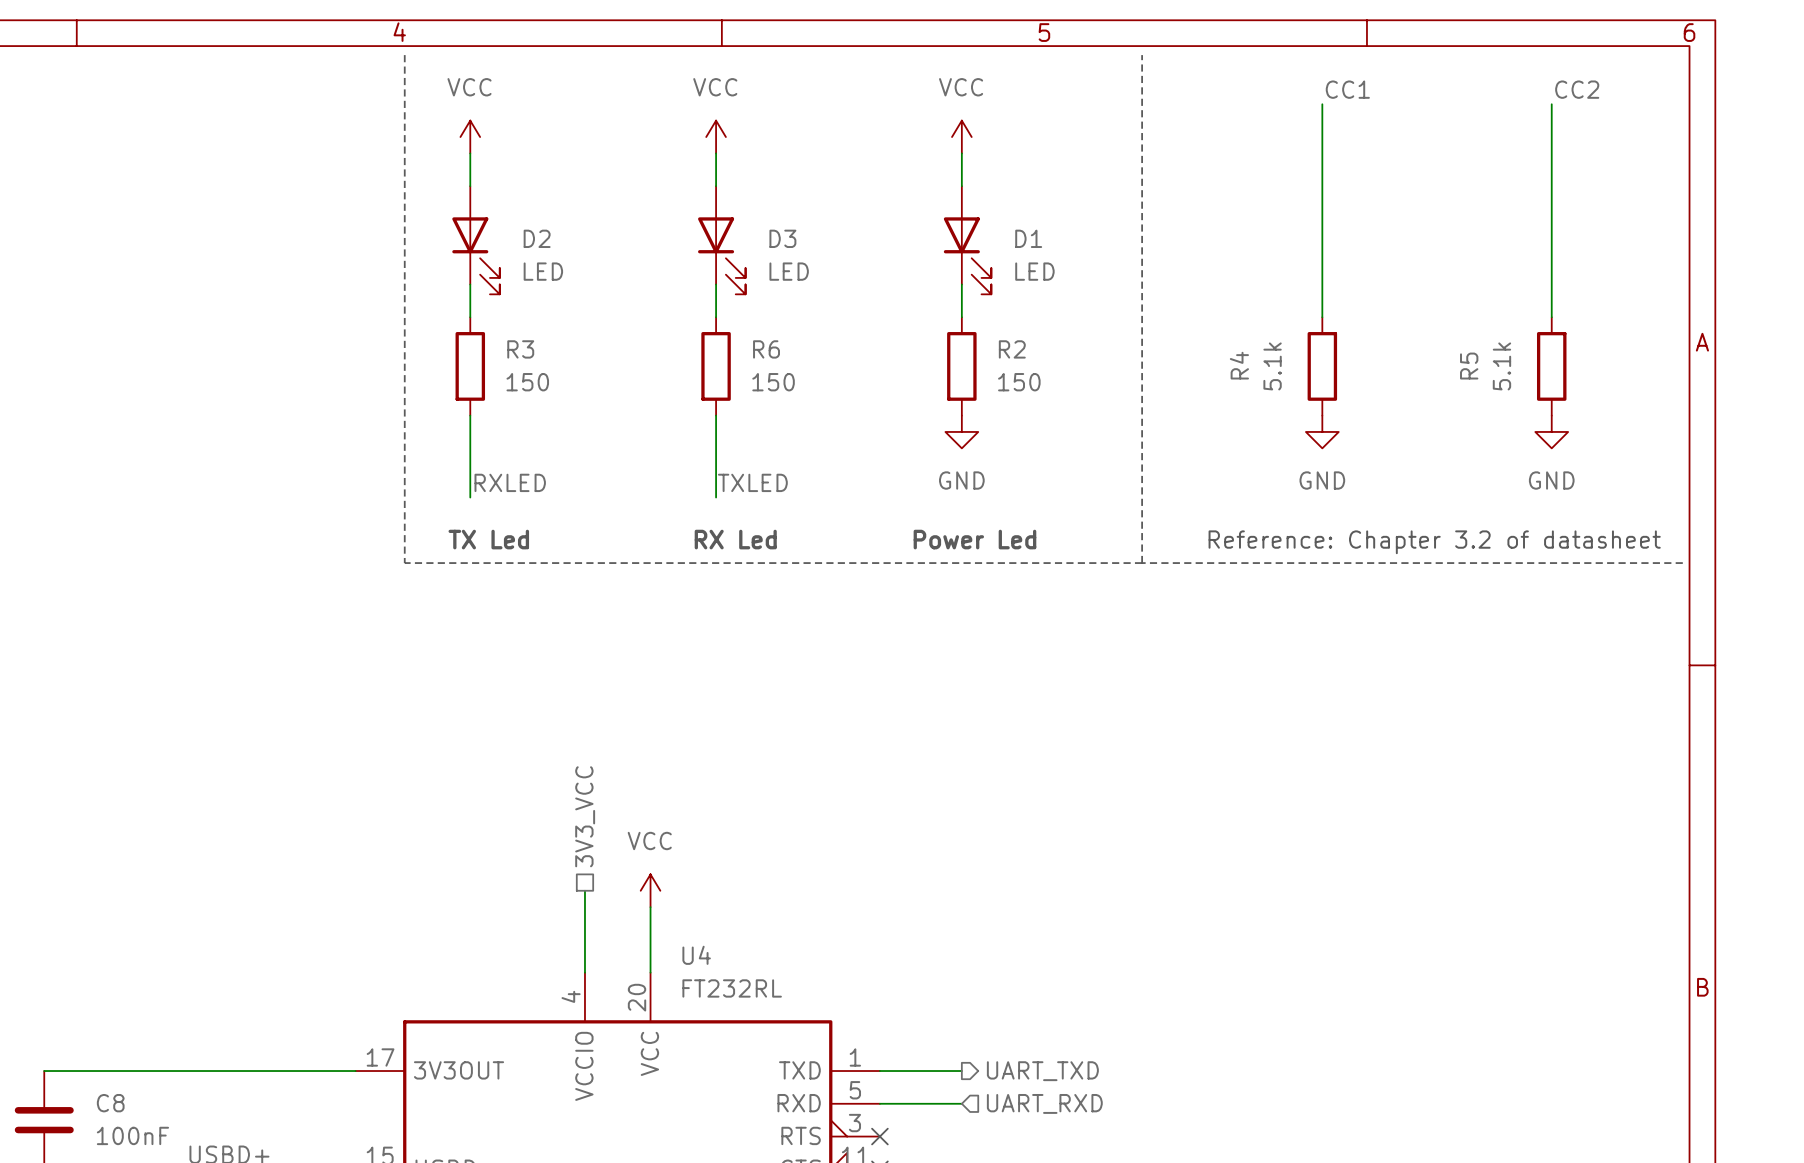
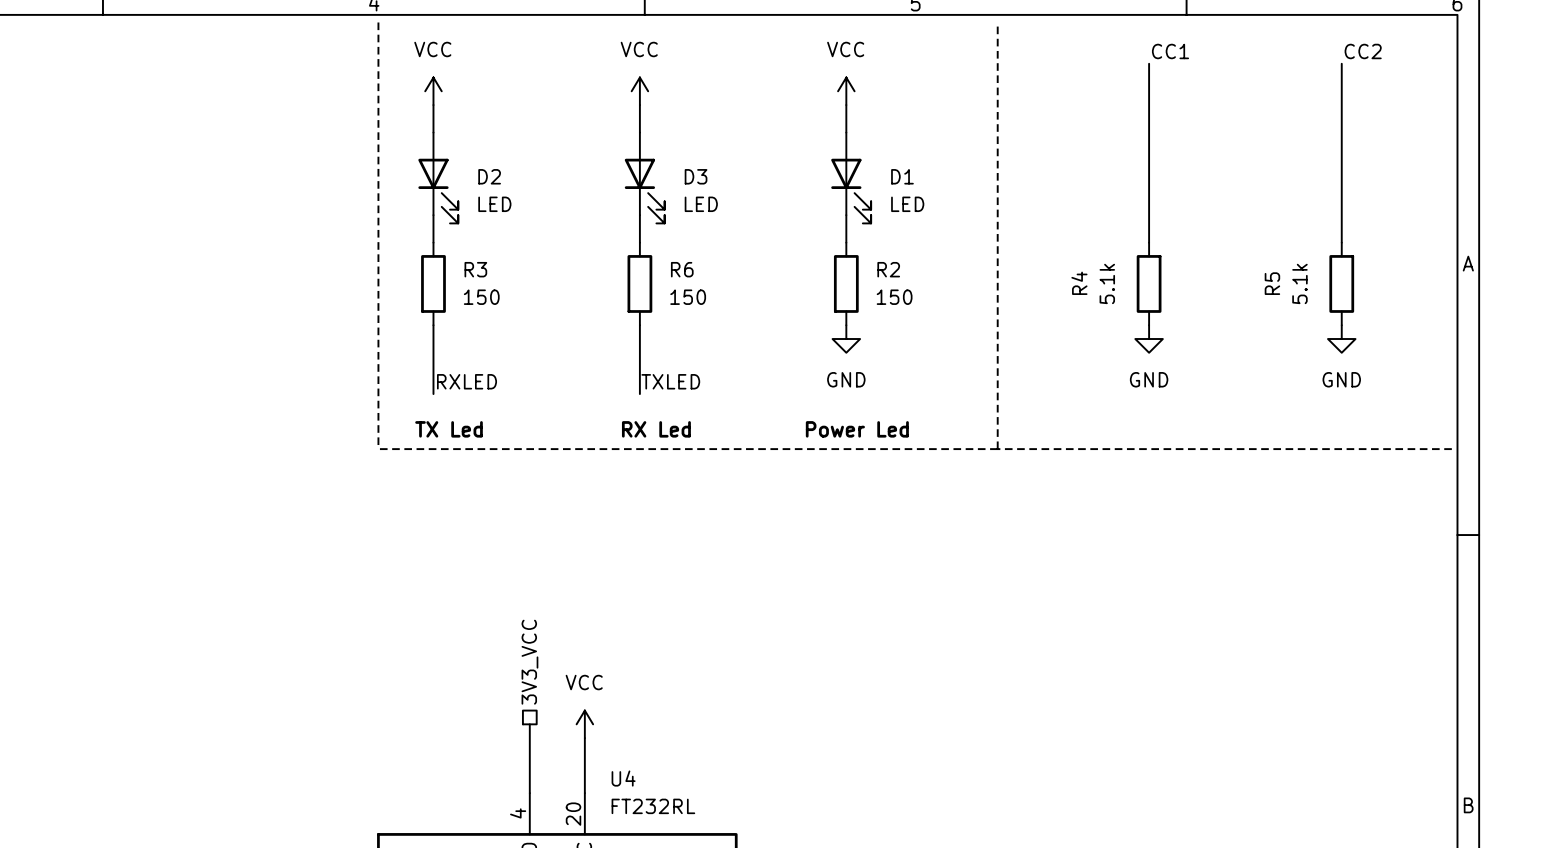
text: Reference: Chapter 3.2 of datasheet (1434, 542) -> none

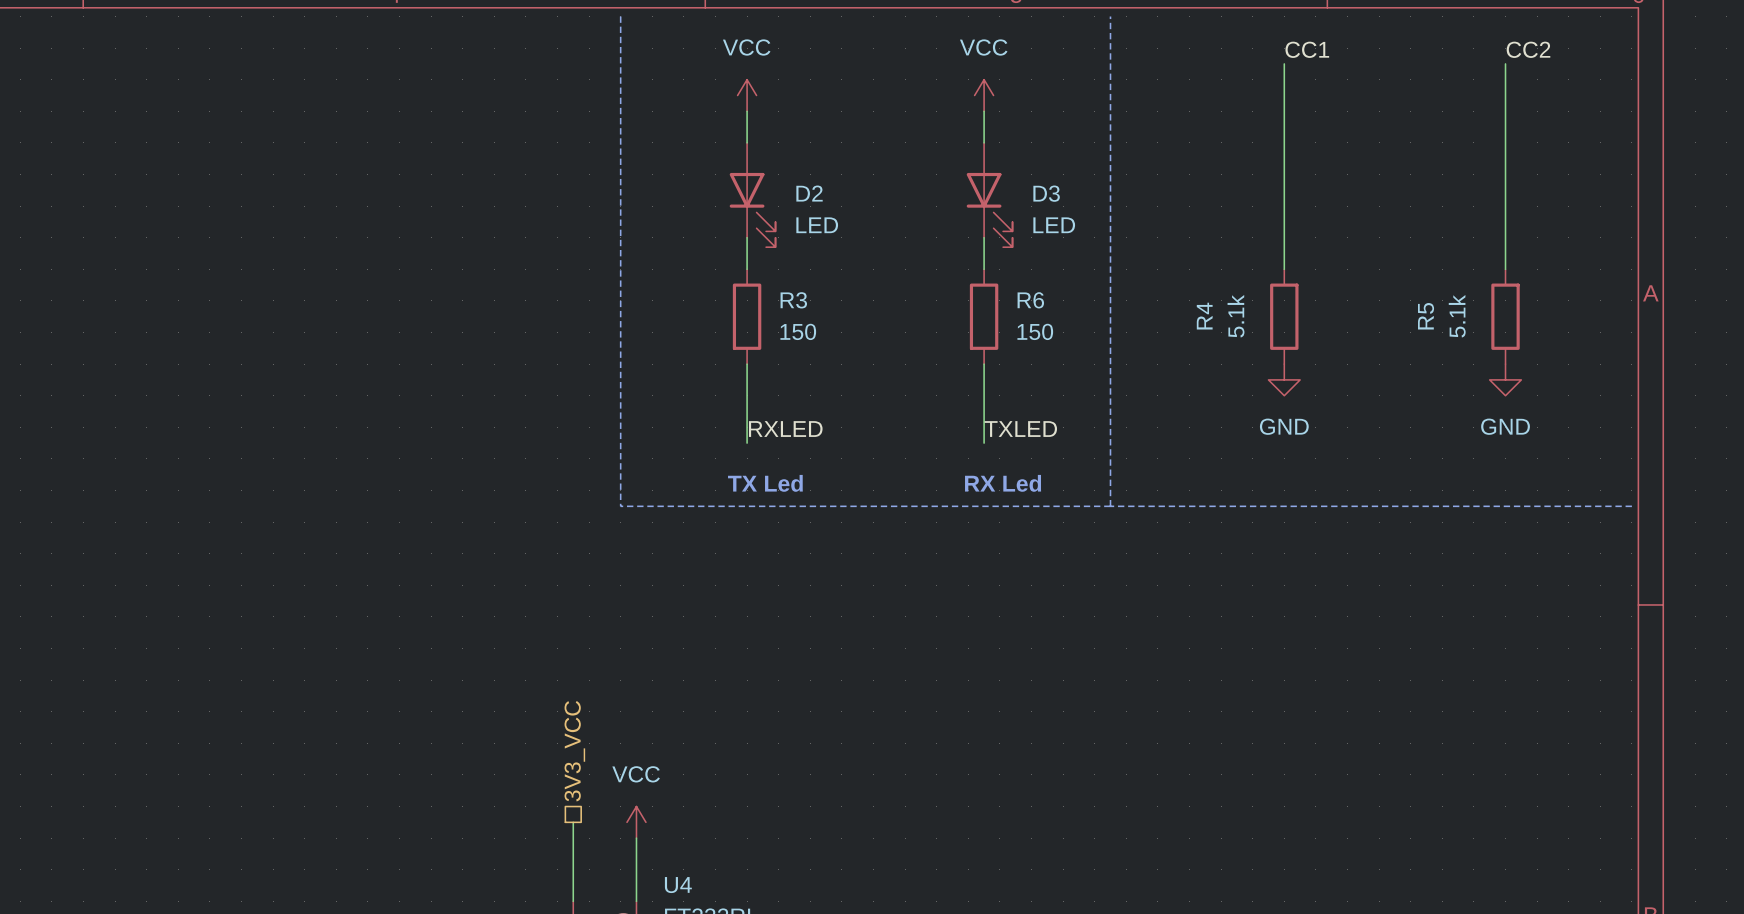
line: (378, 22) (378, 449) (571, 449) -> (620, 16) (620, 506)
power symbol: VCC (433, 91) -> none
power symbol position: VCC (639, 91) -> VCC (747, 95)
power symbol position: VCC (846, 91) -> VCC (984, 95)
wire: (433, 105) (433, 132) -> (747, 111) (747, 142)
wire: (639, 105) (639, 132) -> (984, 111) (984, 142)
wire: (846, 105) (846, 132) -> none
D2 position: (438, 177) -> (752, 195)
D3 position: (644, 177) -> (989, 195)
D1: LED (851, 177) -> none
wire: (433, 215) (433, 242) -> (747, 237) (747, 269)
wire: (639, 215) (639, 242) -> (984, 237) (984, 269)
wire: (846, 215) (846, 242) -> none
R3 position: (433, 283) -> (747, 316)
R6 position: (639, 283) -> (984, 316)
R2: 150 (846, 283) -> none
wire: (433, 325) (433, 394) -> (747, 364) (747, 443)
wire: (639, 325) (639, 394) -> (984, 364) (984, 443)
power symbol: GND (846, 339) -> none
label position: RXLED (467, 381) -> RXLED (785, 429)
label position: TXLED (670, 381) -> TXLED (1020, 429)
text position: TX Led (449, 429) -> TX Led (765, 483)
text position: RX Led (656, 429) -> RX Led (1003, 483)
text: Power Led (857, 429) -> none

